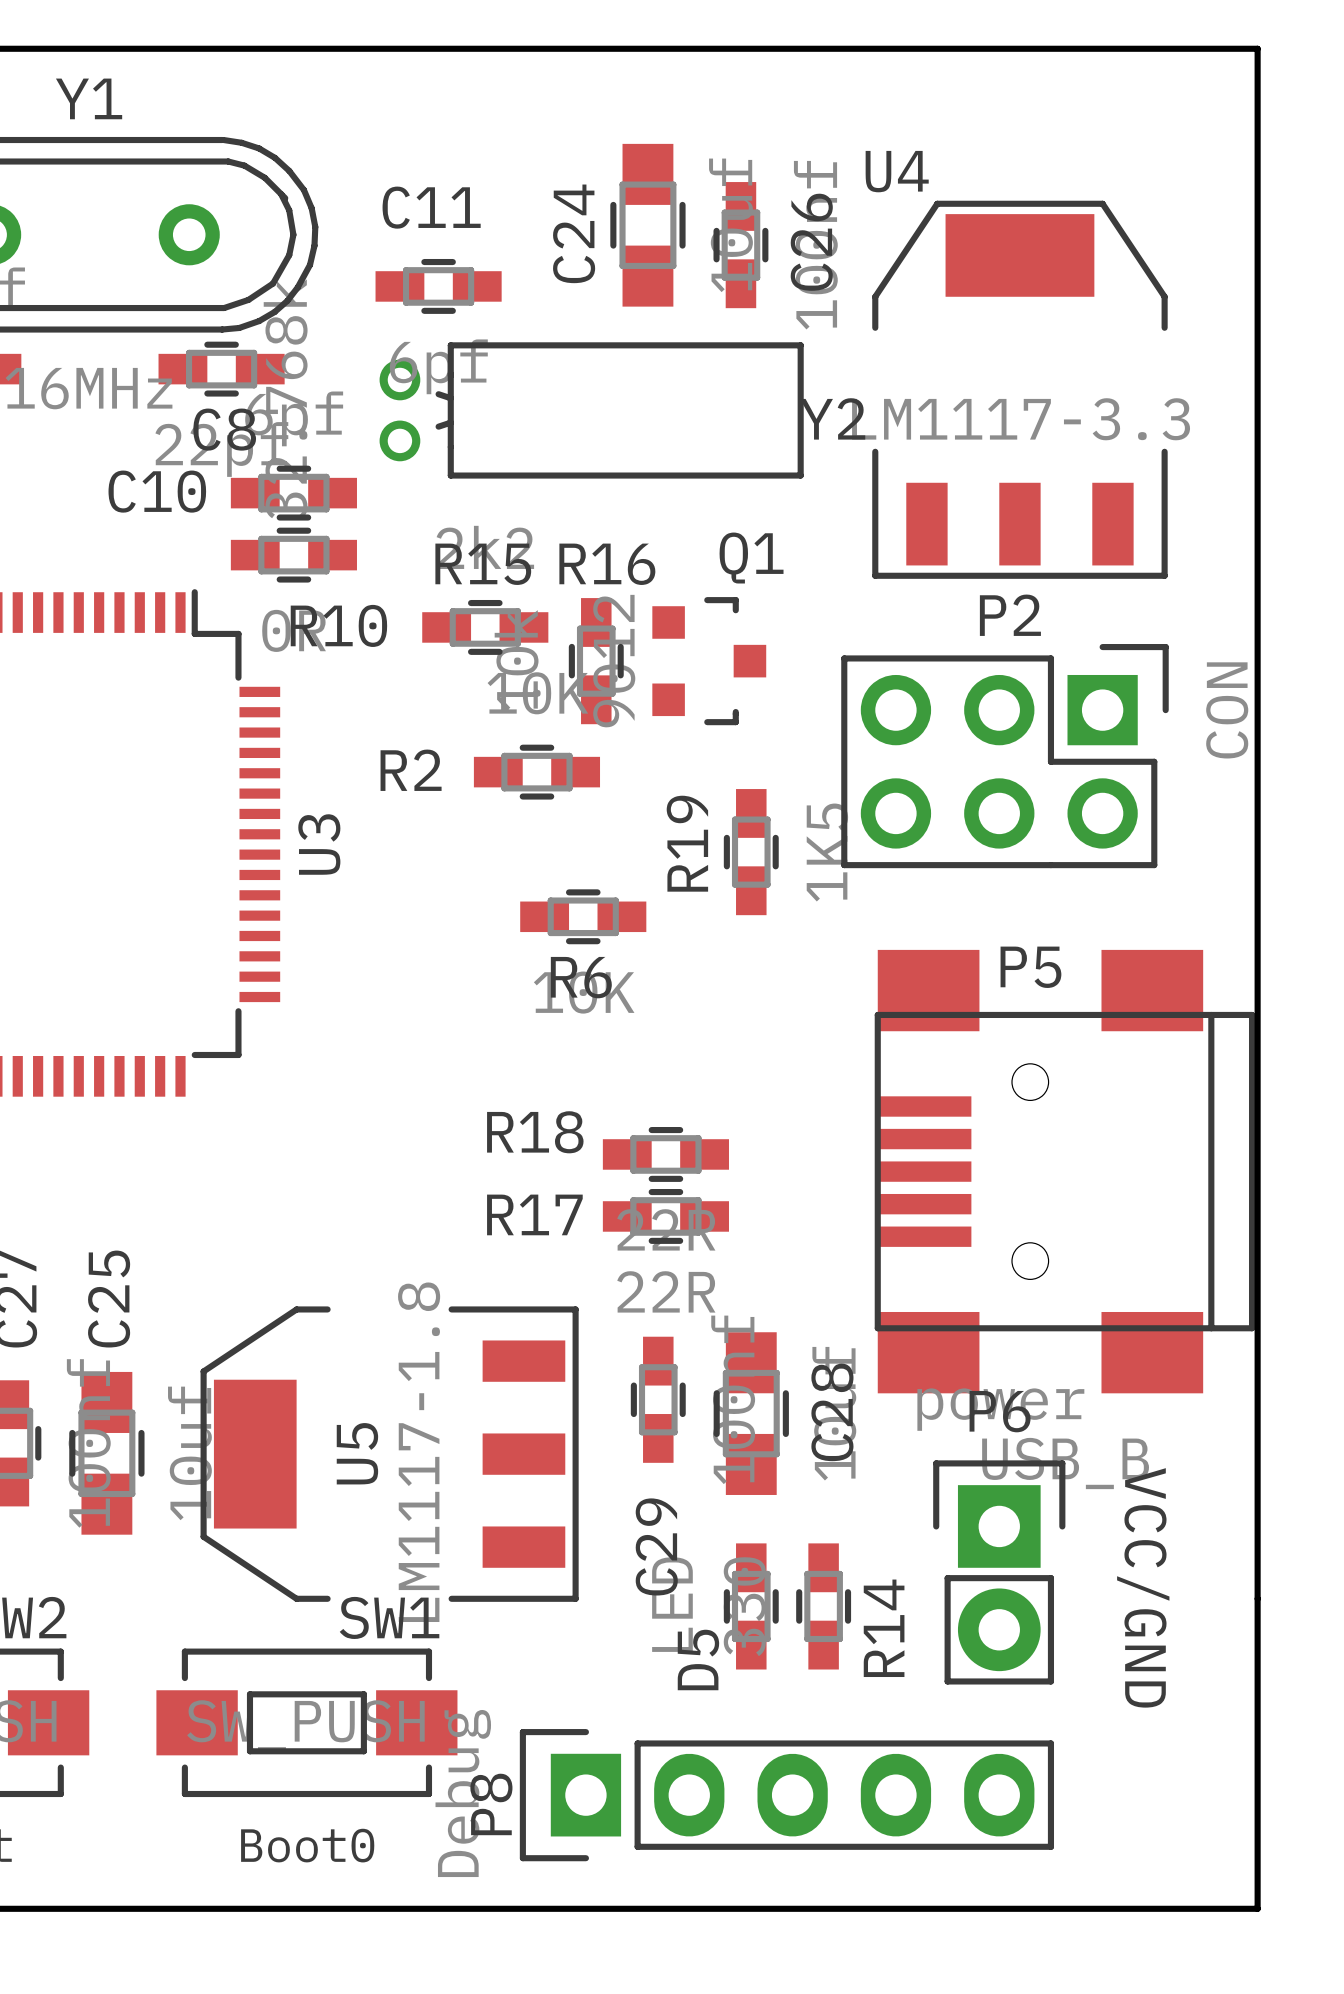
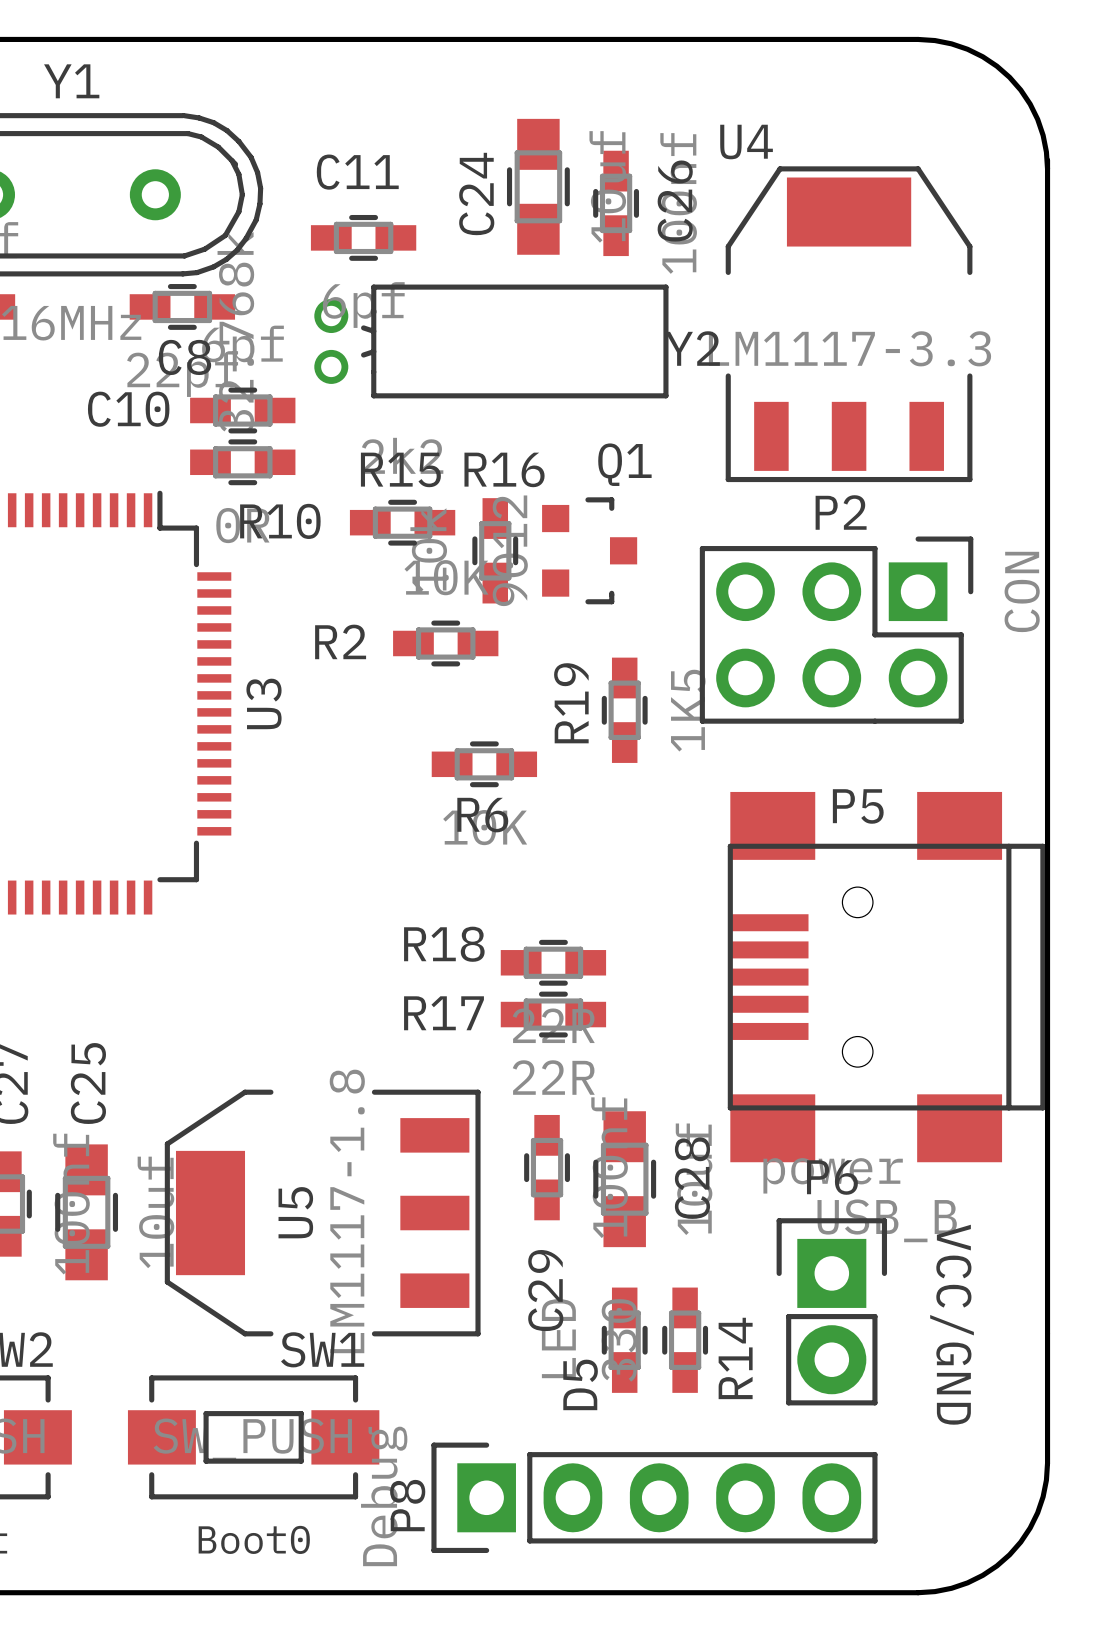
board edge: (1102, 48) (1257, 48) (1257, 193) -> (918, 39) (934, 40) (967, 49) (982, 56) (1009, 77) (1030, 104) (1037, 119) (1046, 151) (1047, 168)
board edge: (1257, 1753) (1257, 1908) (1102, 1908) -> (1047, 1463) (1046, 1480) (1037, 1512) (1030, 1527) (1009, 1554) (982, 1575) (967, 1582) (934, 1591) (918, 1592)

